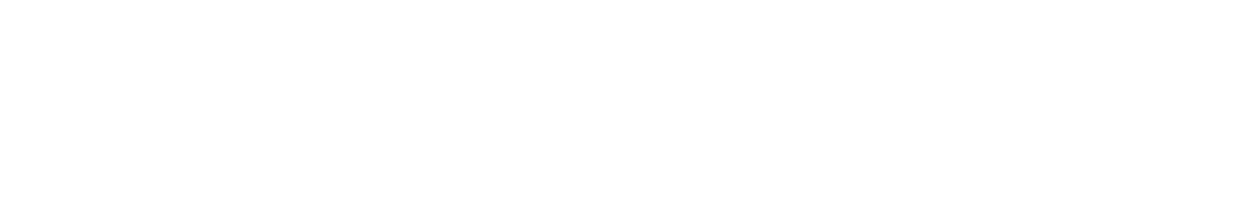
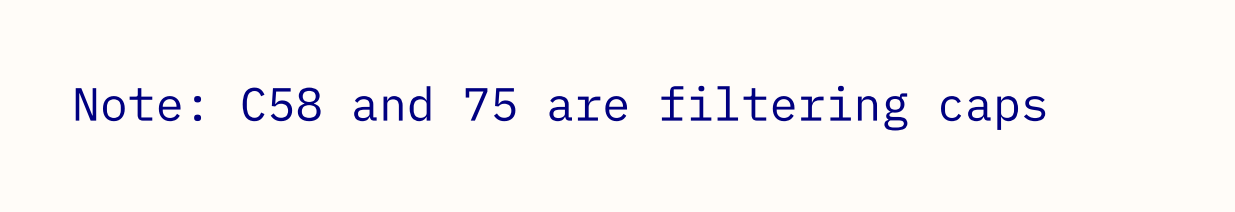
text: none -> Note: C58 and 75 are filtering caps (560, 108)

